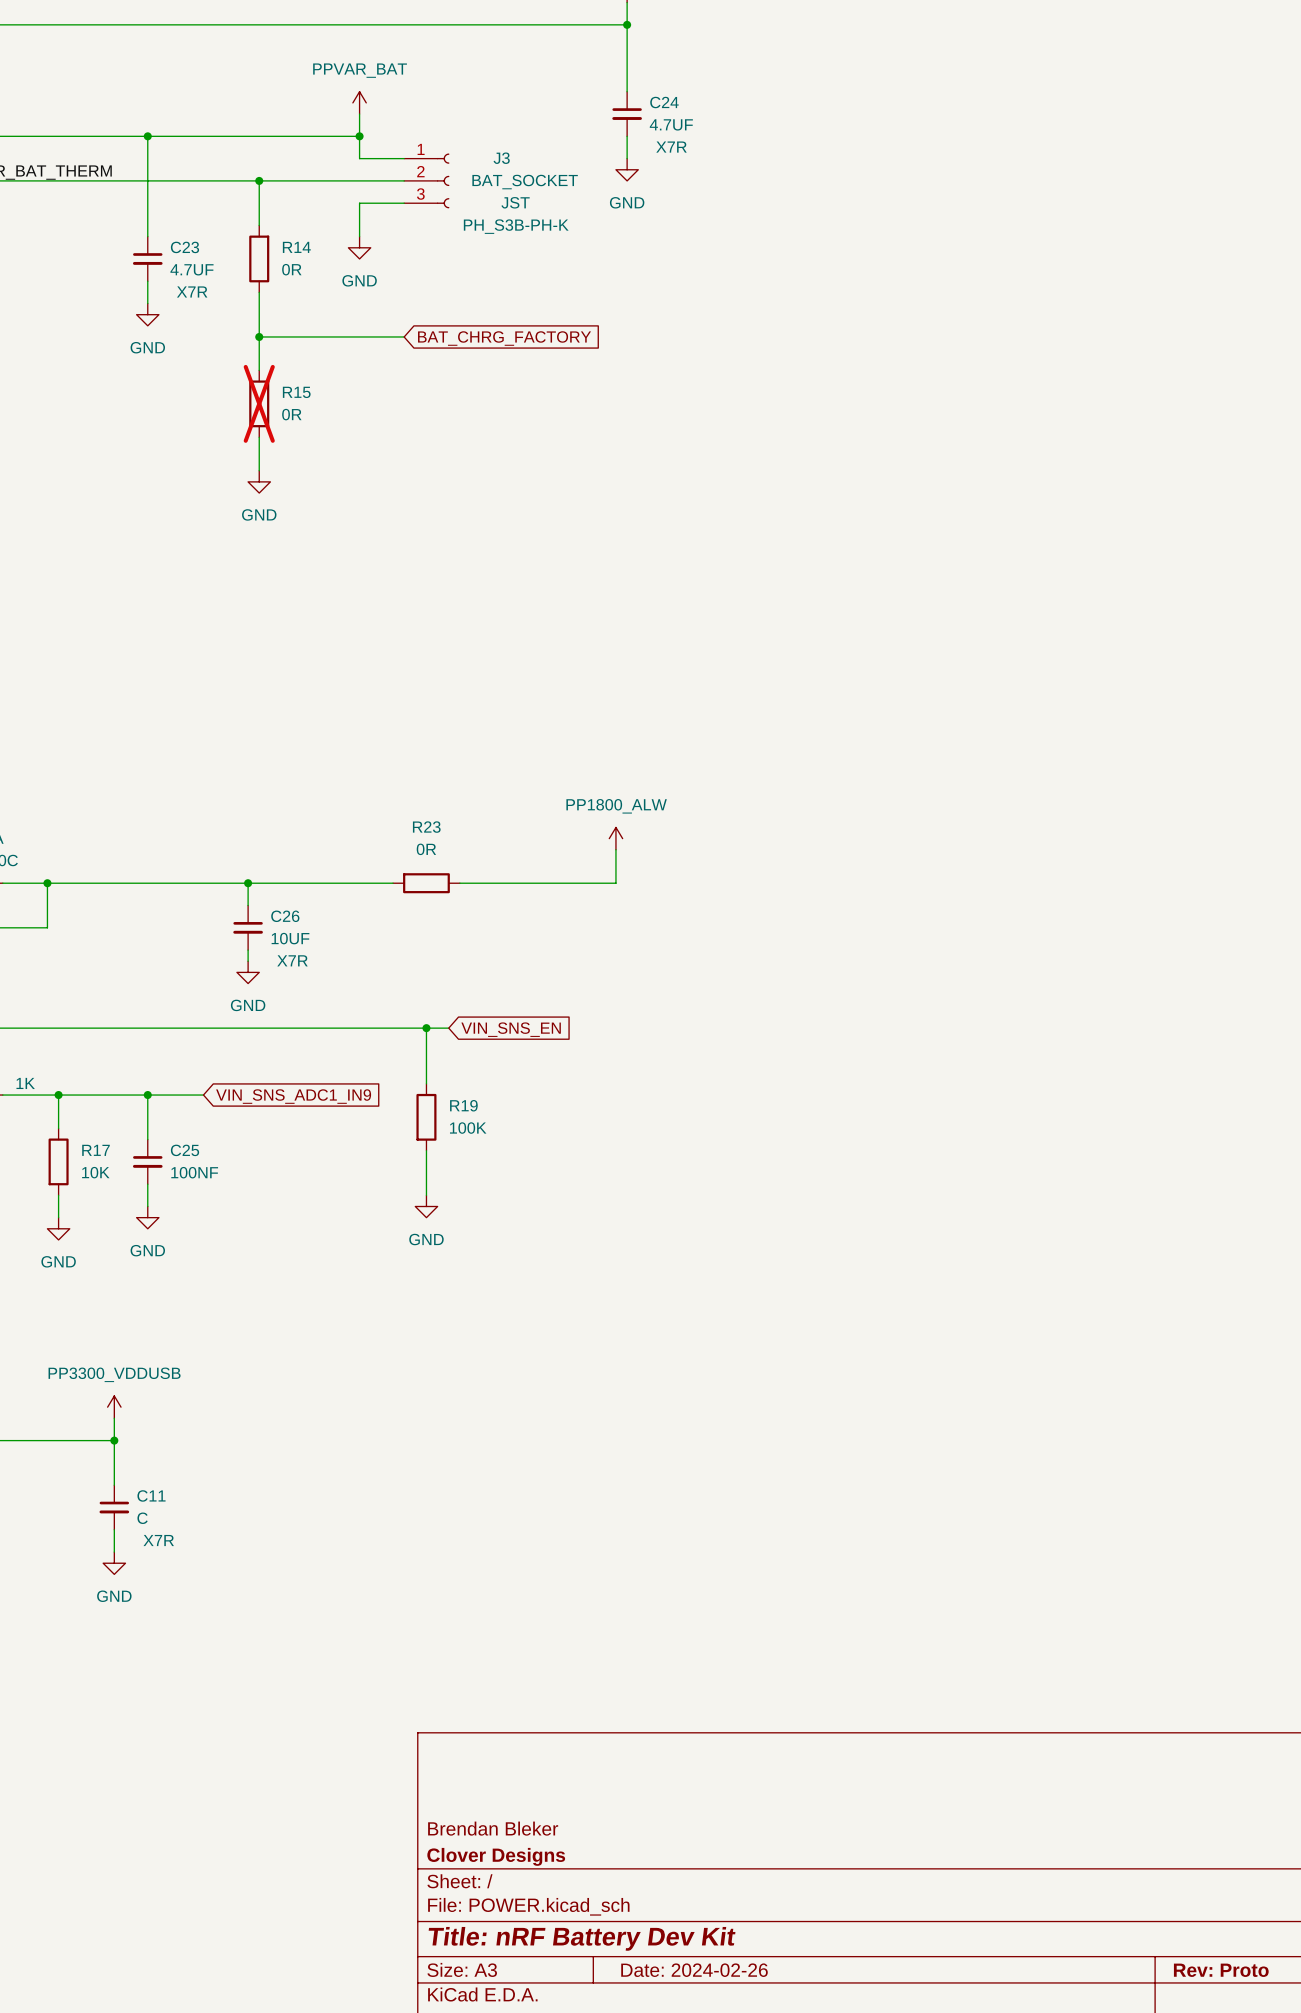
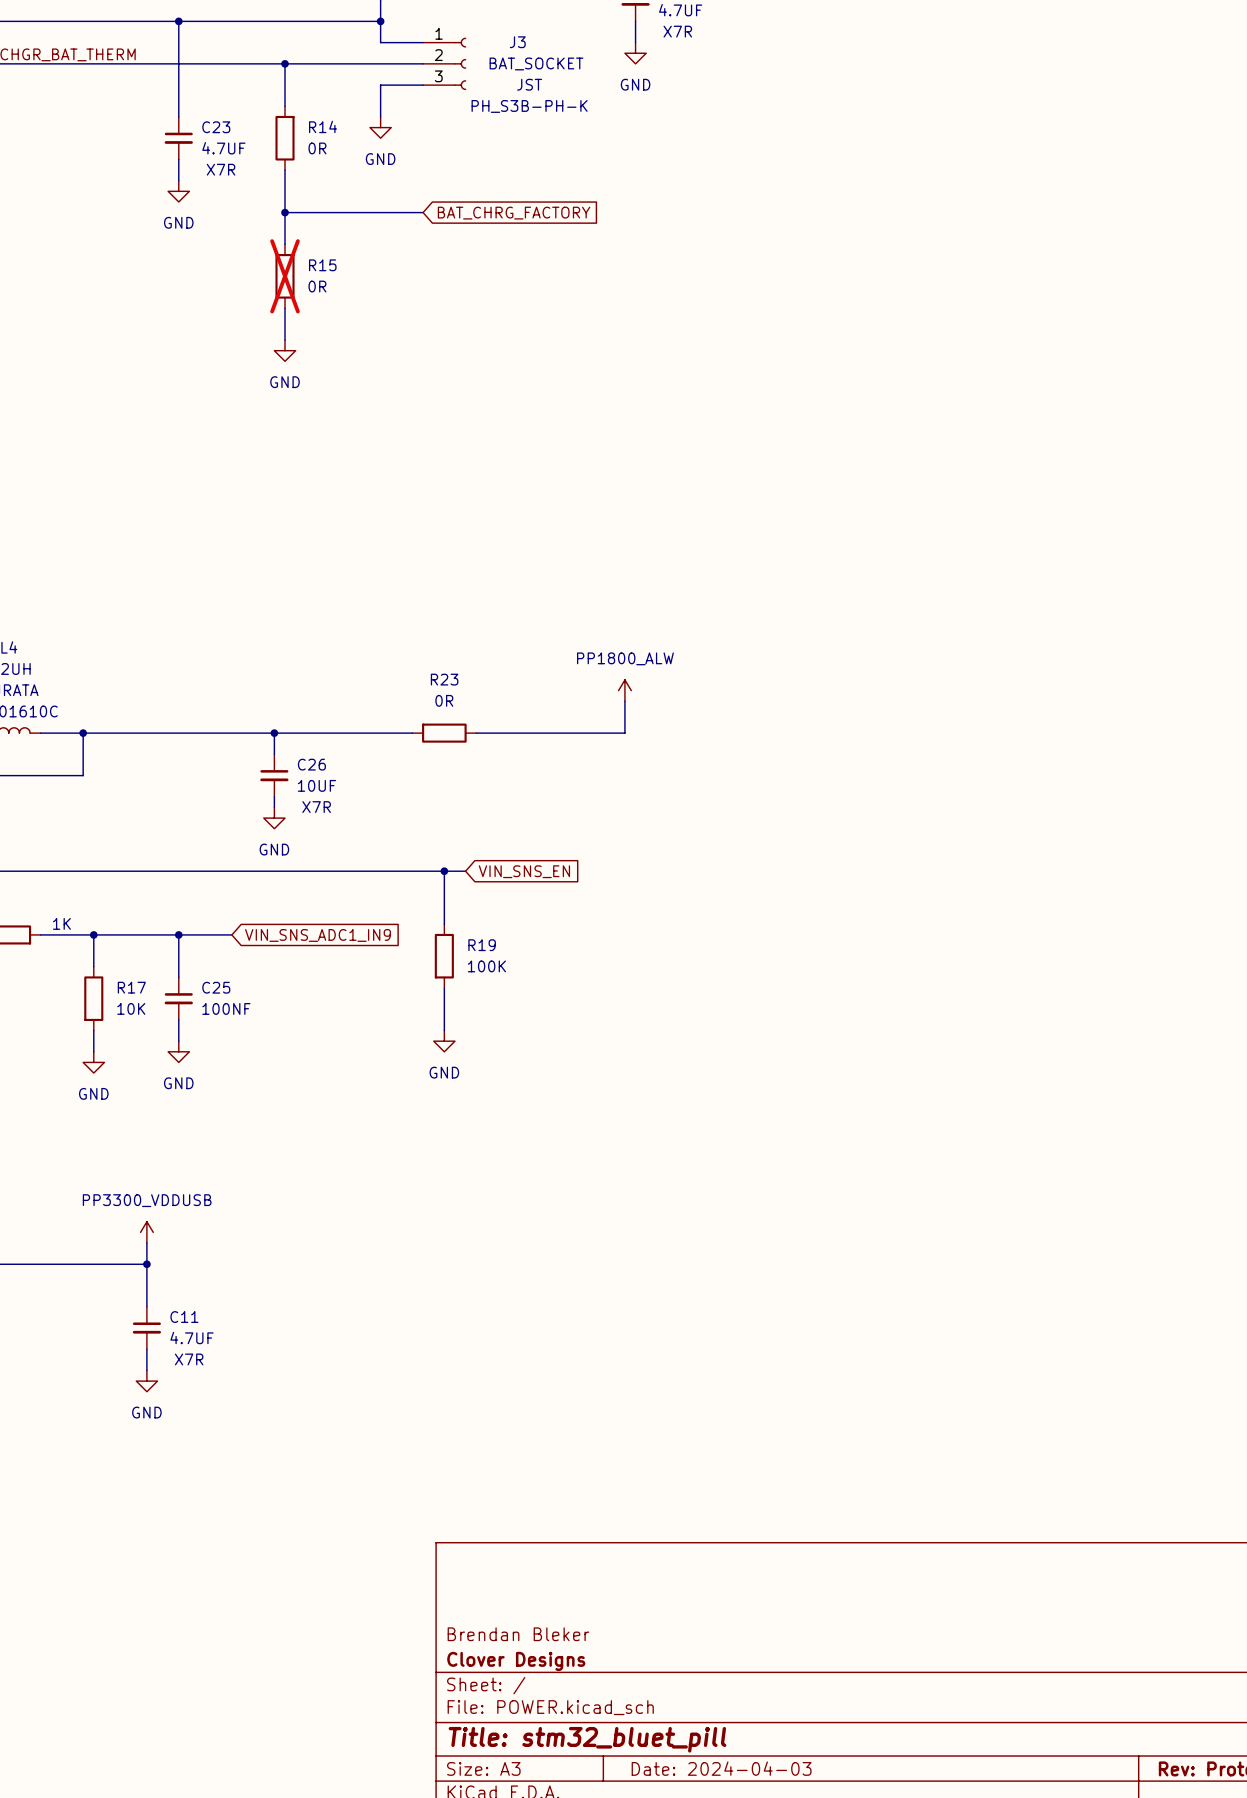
C11 value: C (142, 1518) -> 4.7UF (192, 1338)
title block: Title: nRF Battery Dev Kit (582, 1938) -> Title: stm32_bluet_pill (587, 1739)
title block: Date: 2024-02-26 (694, 1970) -> Date: 2024-04-03 (721, 1768)

